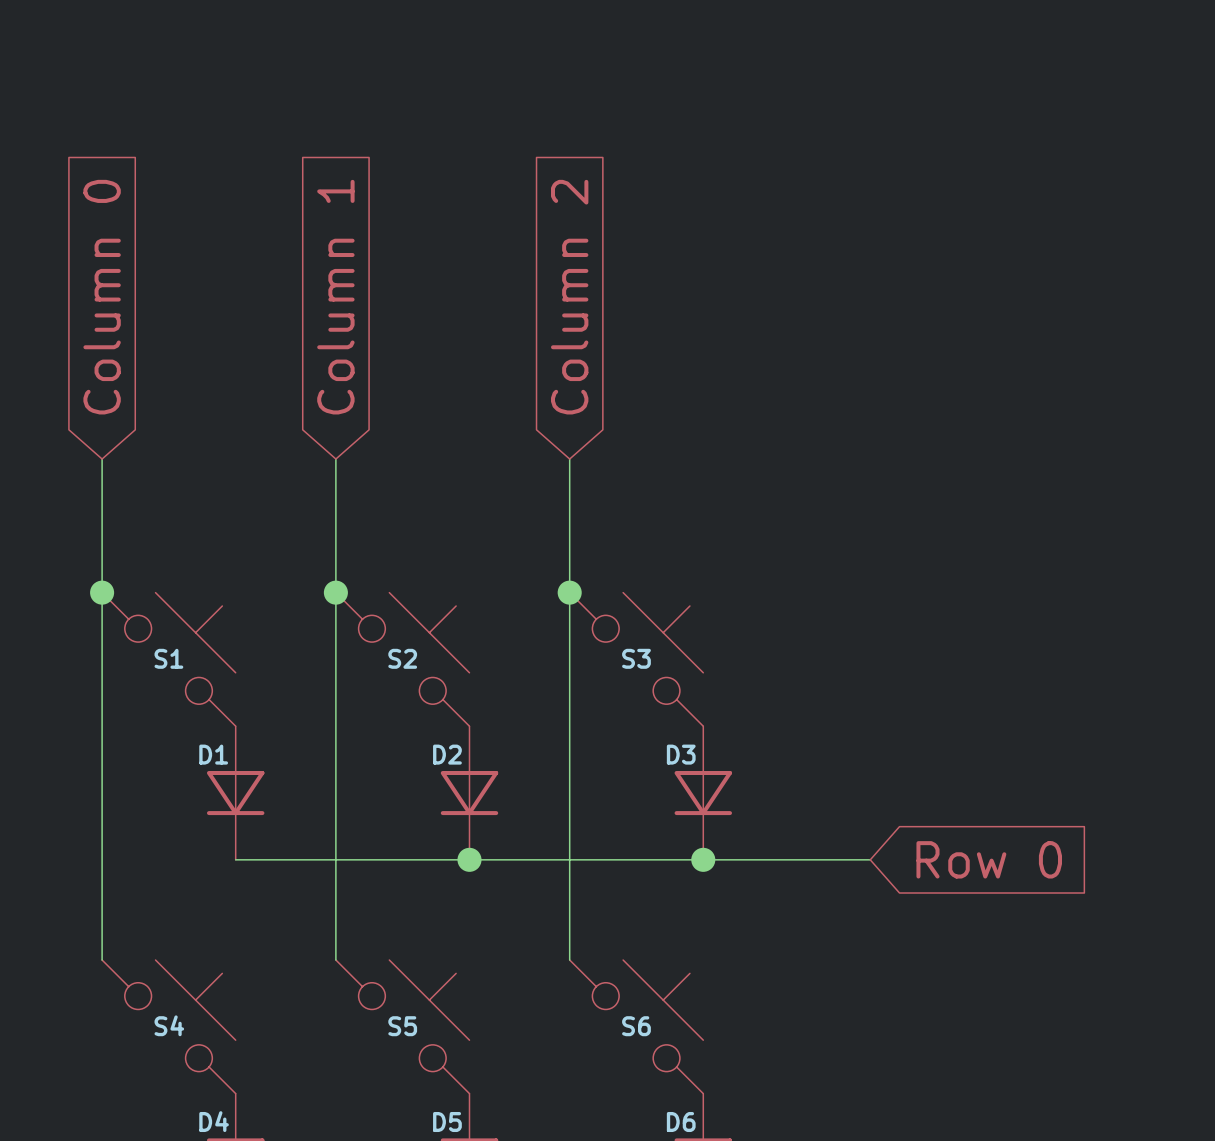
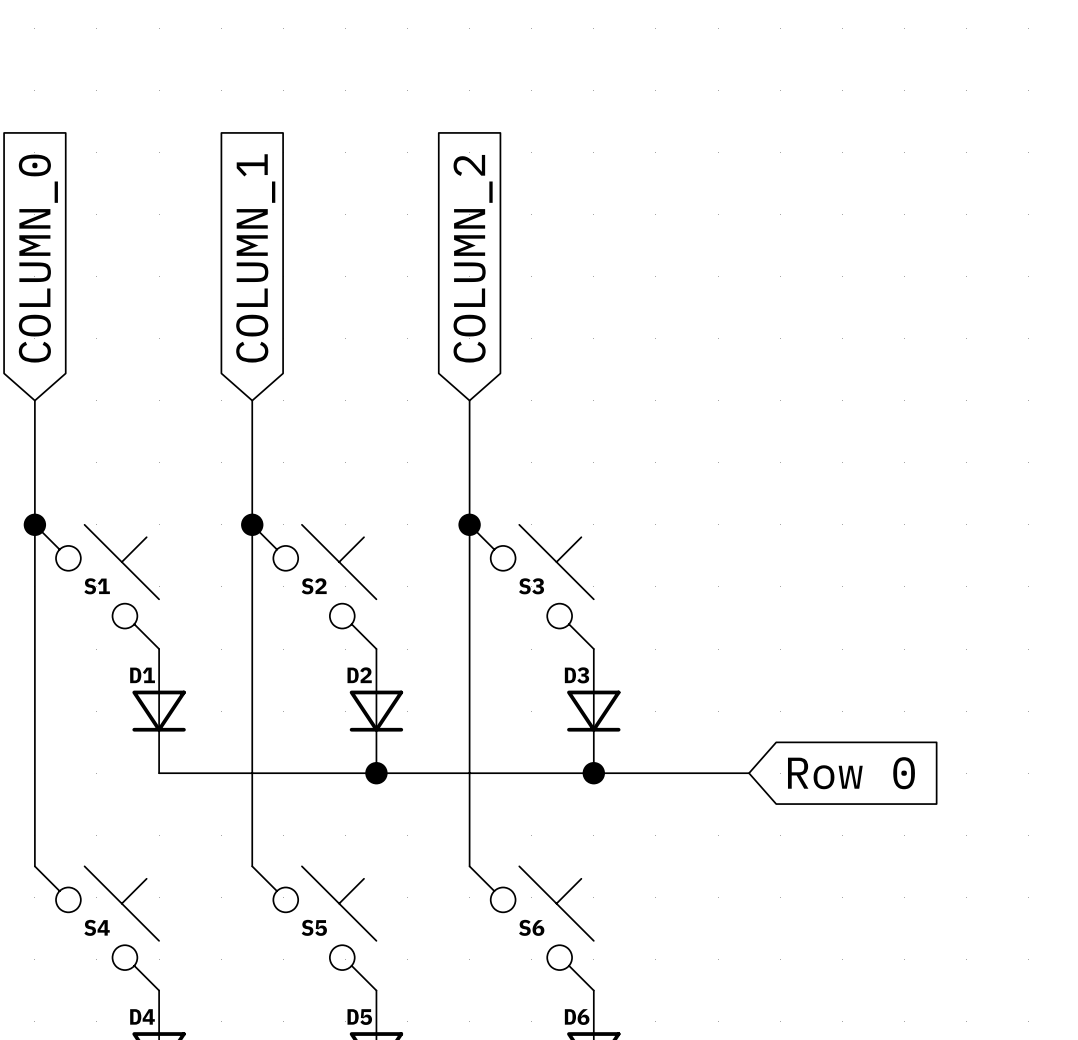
global label: Column 0 (102, 297) -> COLUMN_0 (38, 258)
global label: Column 1 (335, 297) -> COLUMN_1 (255, 258)
global label: Column 2 (569, 297) -> COLUMN_2 (473, 258)

